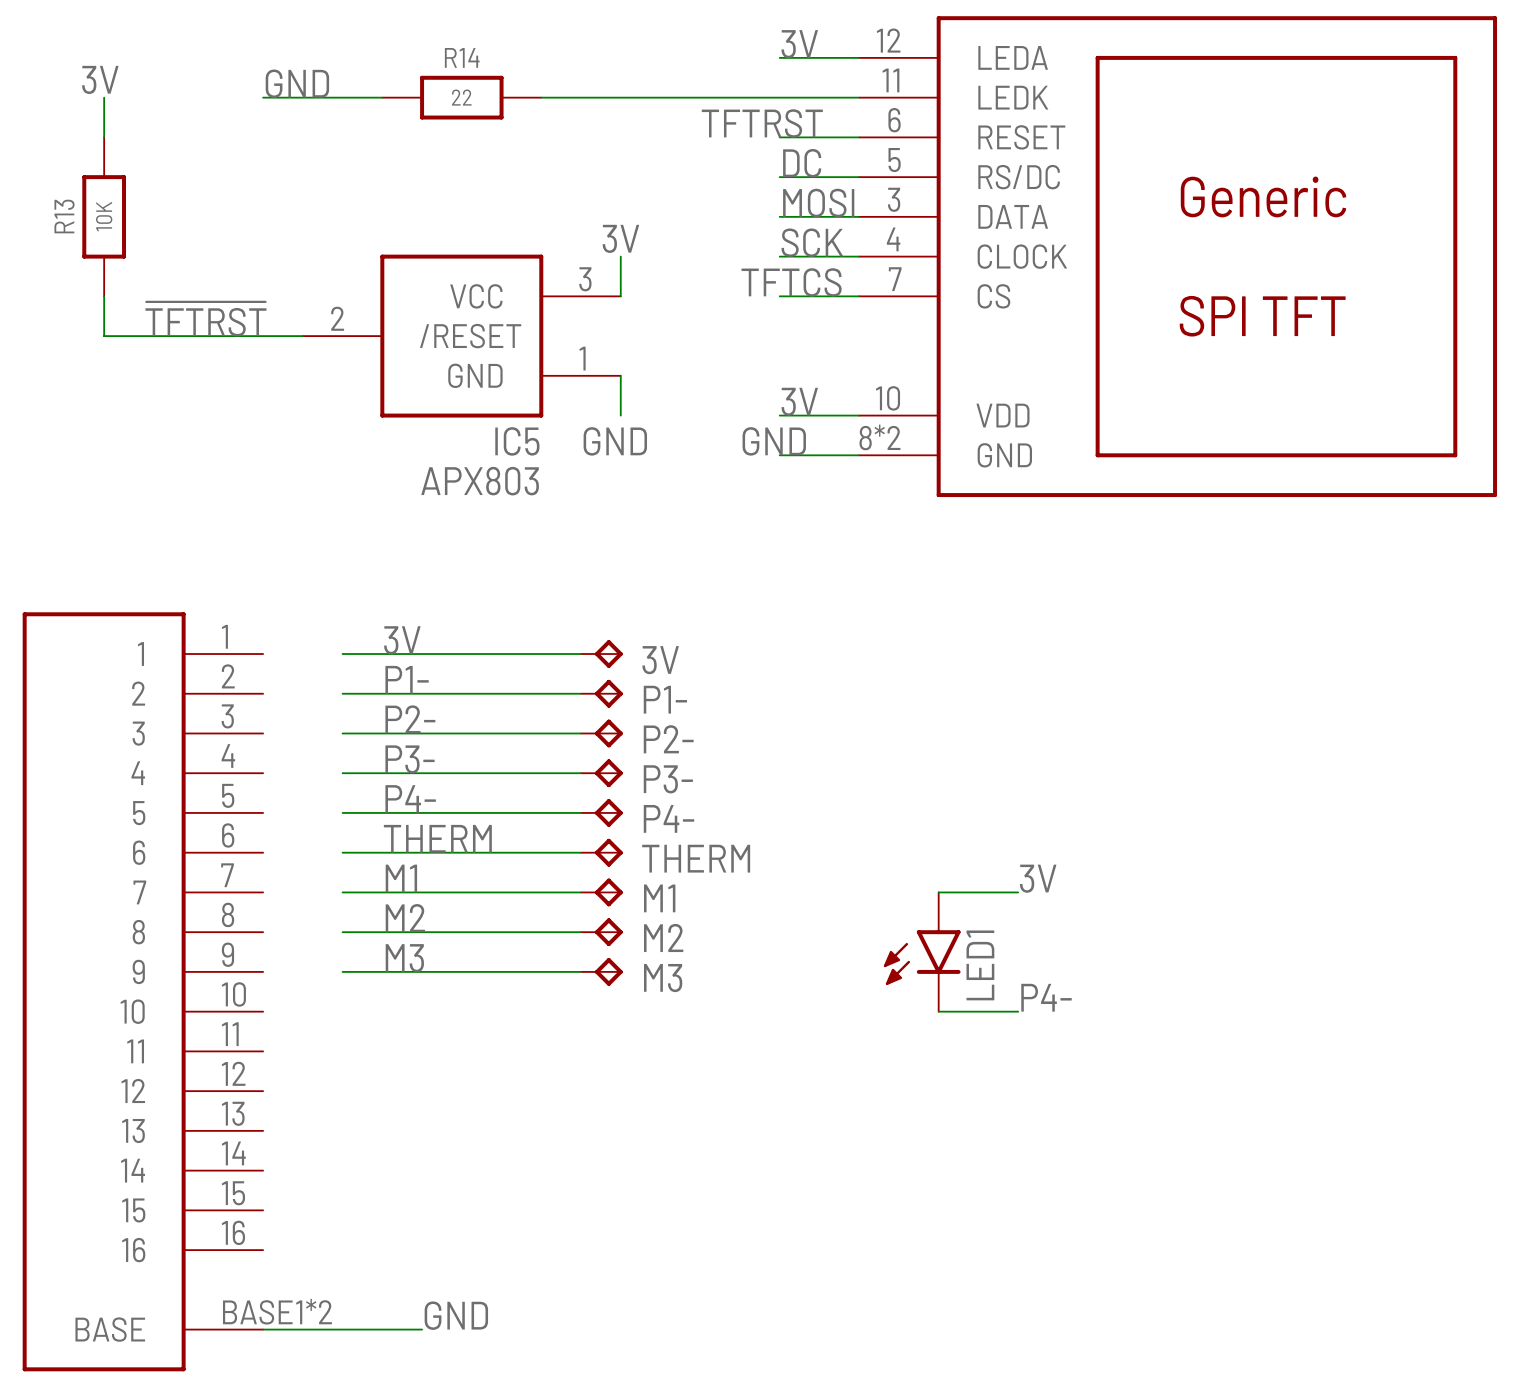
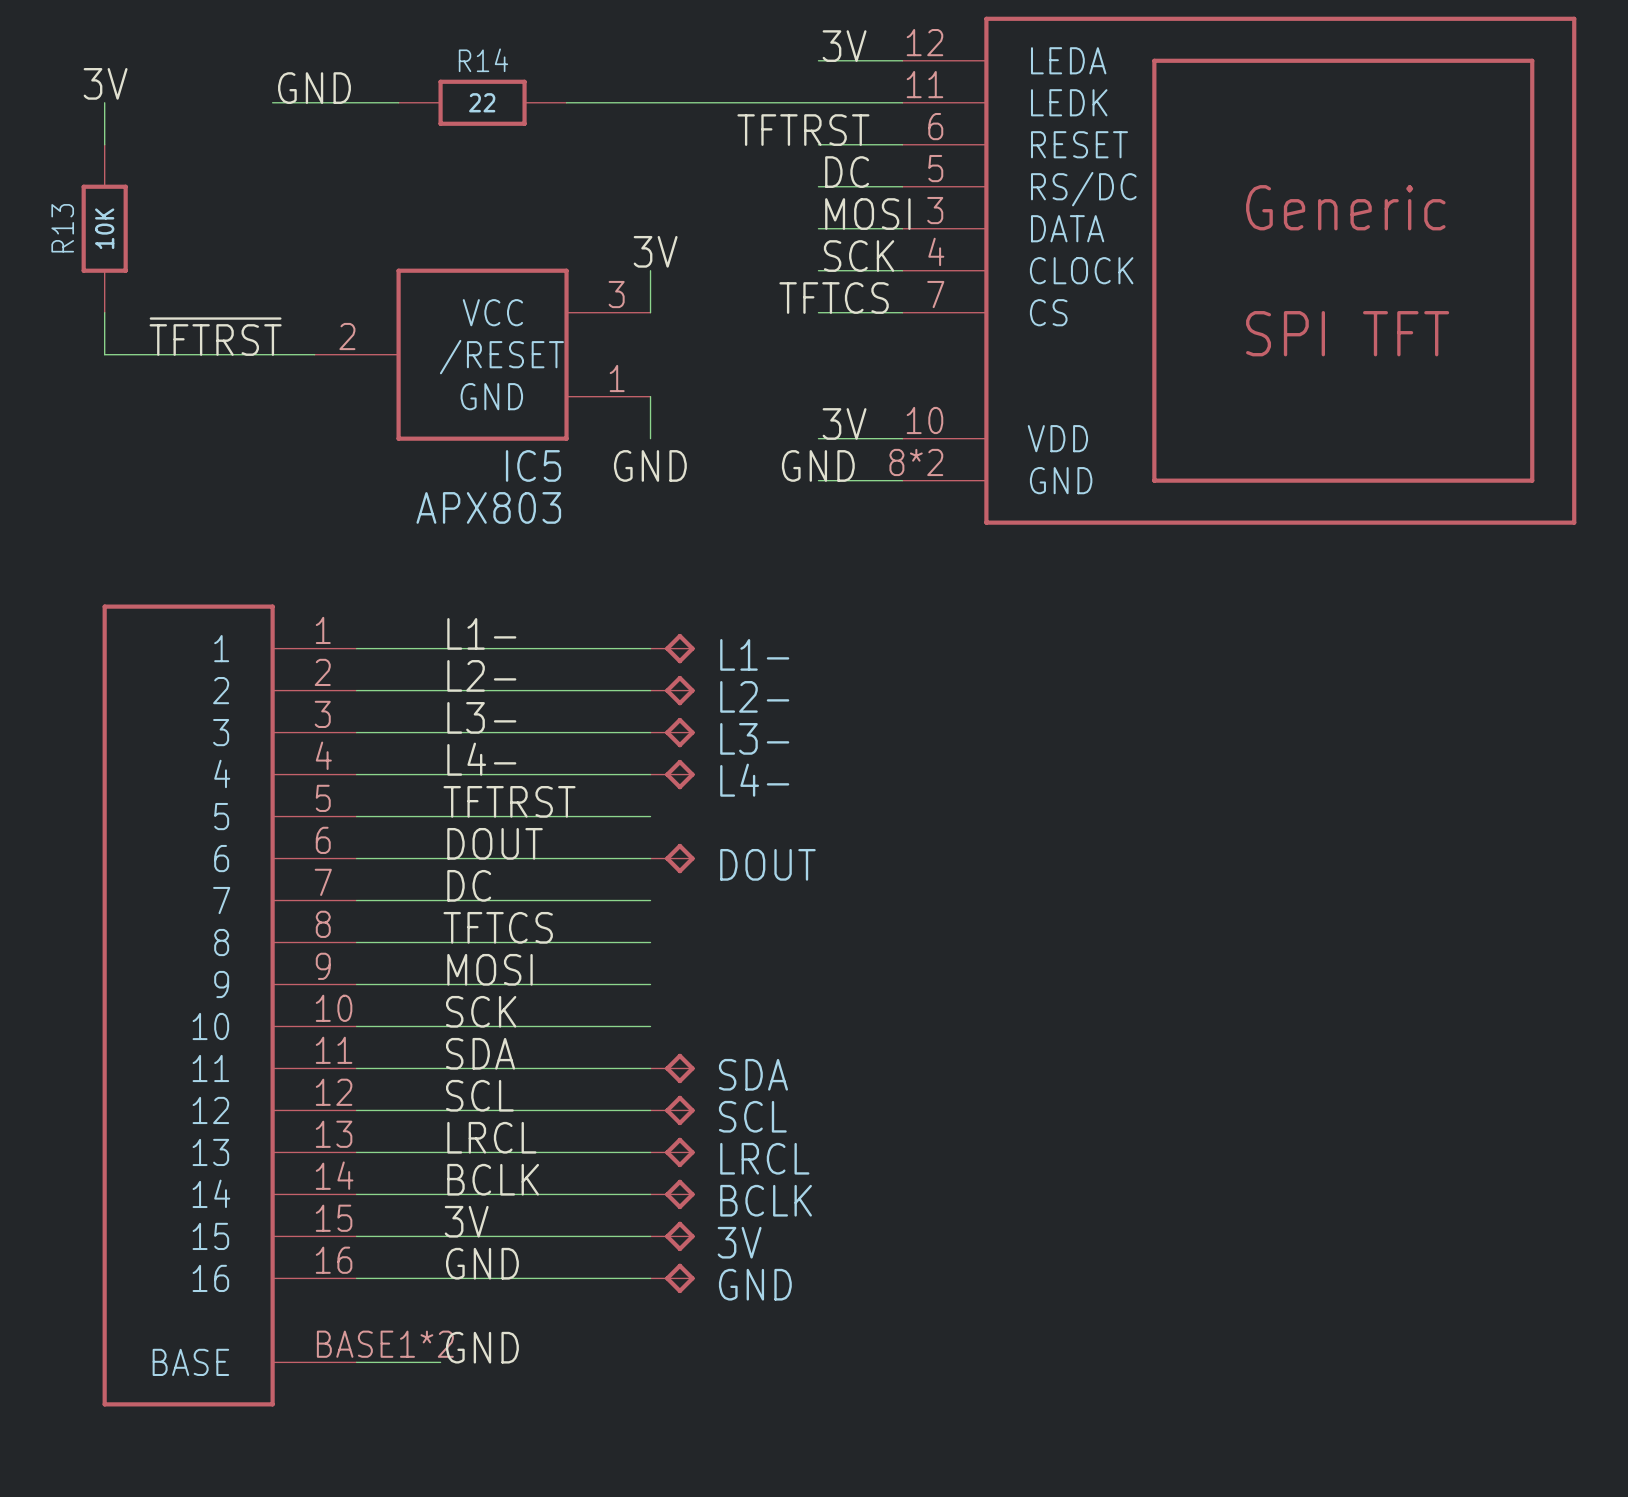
label: none -> L1- (481, 633)
wire: none -> (356, 648) (650, 648)
L1-: none -> (672, 648)
label: none -> L2- (481, 675)
label: 3V (402, 640) -> none
3V position: (601, 654) -> (672, 1236)
L2-: none -> (672, 690)
label: P1- (407, 679) -> none
label: none -> L3- (481, 717)
P1-: (601, 693) -> none
L3-: none -> (672, 732)
label: P2- (410, 719) -> none
label: none -> L4- (481, 759)
P2-: (601, 733) -> none
L4-: none -> (672, 774)
label: P3- (410, 759) -> none
label: none -> TFTRST (509, 801)
P3-: (601, 773) -> none
label: P4- (410, 799) -> none
label: none -> DOUT (495, 843)
P4-: (601, 812) -> none
DOUT: none -> (672, 858)
label: THERM (437, 838) -> none
label: none -> DC (469, 885)
THERM: (601, 852) -> none
label: M1 (401, 878) -> none
label: none -> TFTCS (498, 927)
label: 3V (1038, 878) -> none
M1: (601, 892) -> none
wire: (938, 892) (1018, 892) -> none
label: M2 (405, 918) -> none
label: none -> MOSI (489, 969)
M2: (601, 932) -> none
LED1: (922, 952) -> none
label: M3 (404, 958) -> none
label: none -> SCK (481, 1011)
M3: (601, 971) -> none
part position: (142, 991) -> (229, 1005)
label: none -> SDA (480, 1053)
label: P4- (1046, 997) -> none
wire: none -> (356, 1068) (650, 1068)
SDA: none -> (672, 1068)
wire: (938, 1011) (1018, 1011) -> none
label: none -> SCL (479, 1095)
wire: none -> (356, 1110) (650, 1110)
SCL: none -> (672, 1110)
label: none -> LRCL (491, 1137)
wire: none -> (356, 1152) (650, 1152)
LRCL: none -> (672, 1152)
label: none -> BCLK (493, 1179)
wire: none -> (356, 1194) (650, 1194)
BCLK: none -> (672, 1194)
label: none -> 3V (466, 1221)
wire: none -> (356, 1236) (650, 1236)
label: none -> GND (482, 1263)
wire: none -> (356, 1278) (650, 1278)
GND: none -> (672, 1278)
wire: none -> (356, 1362) (440, 1362)
label position: GND (456, 1315) -> GND (482, 1347)
wire: (263, 1329) (422, 1329) -> none

